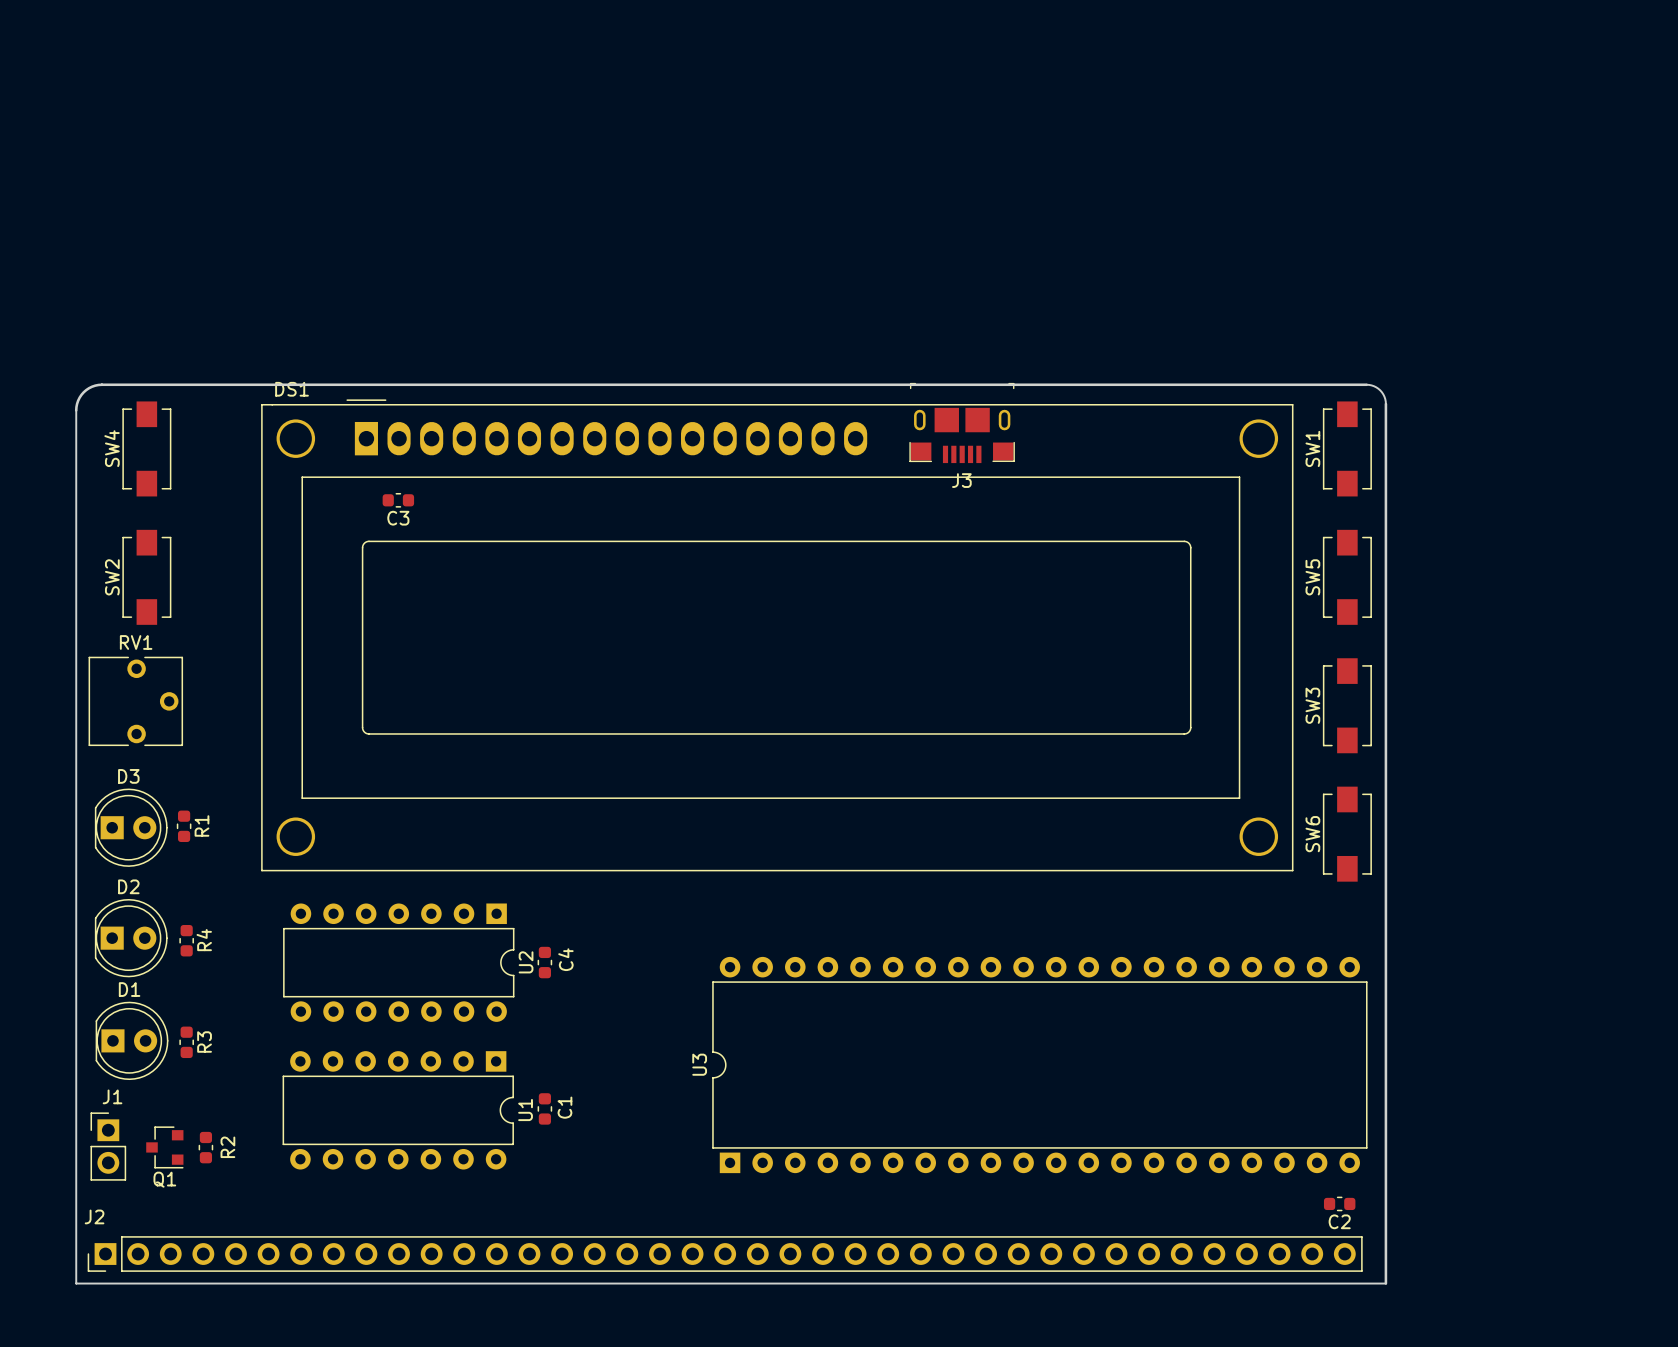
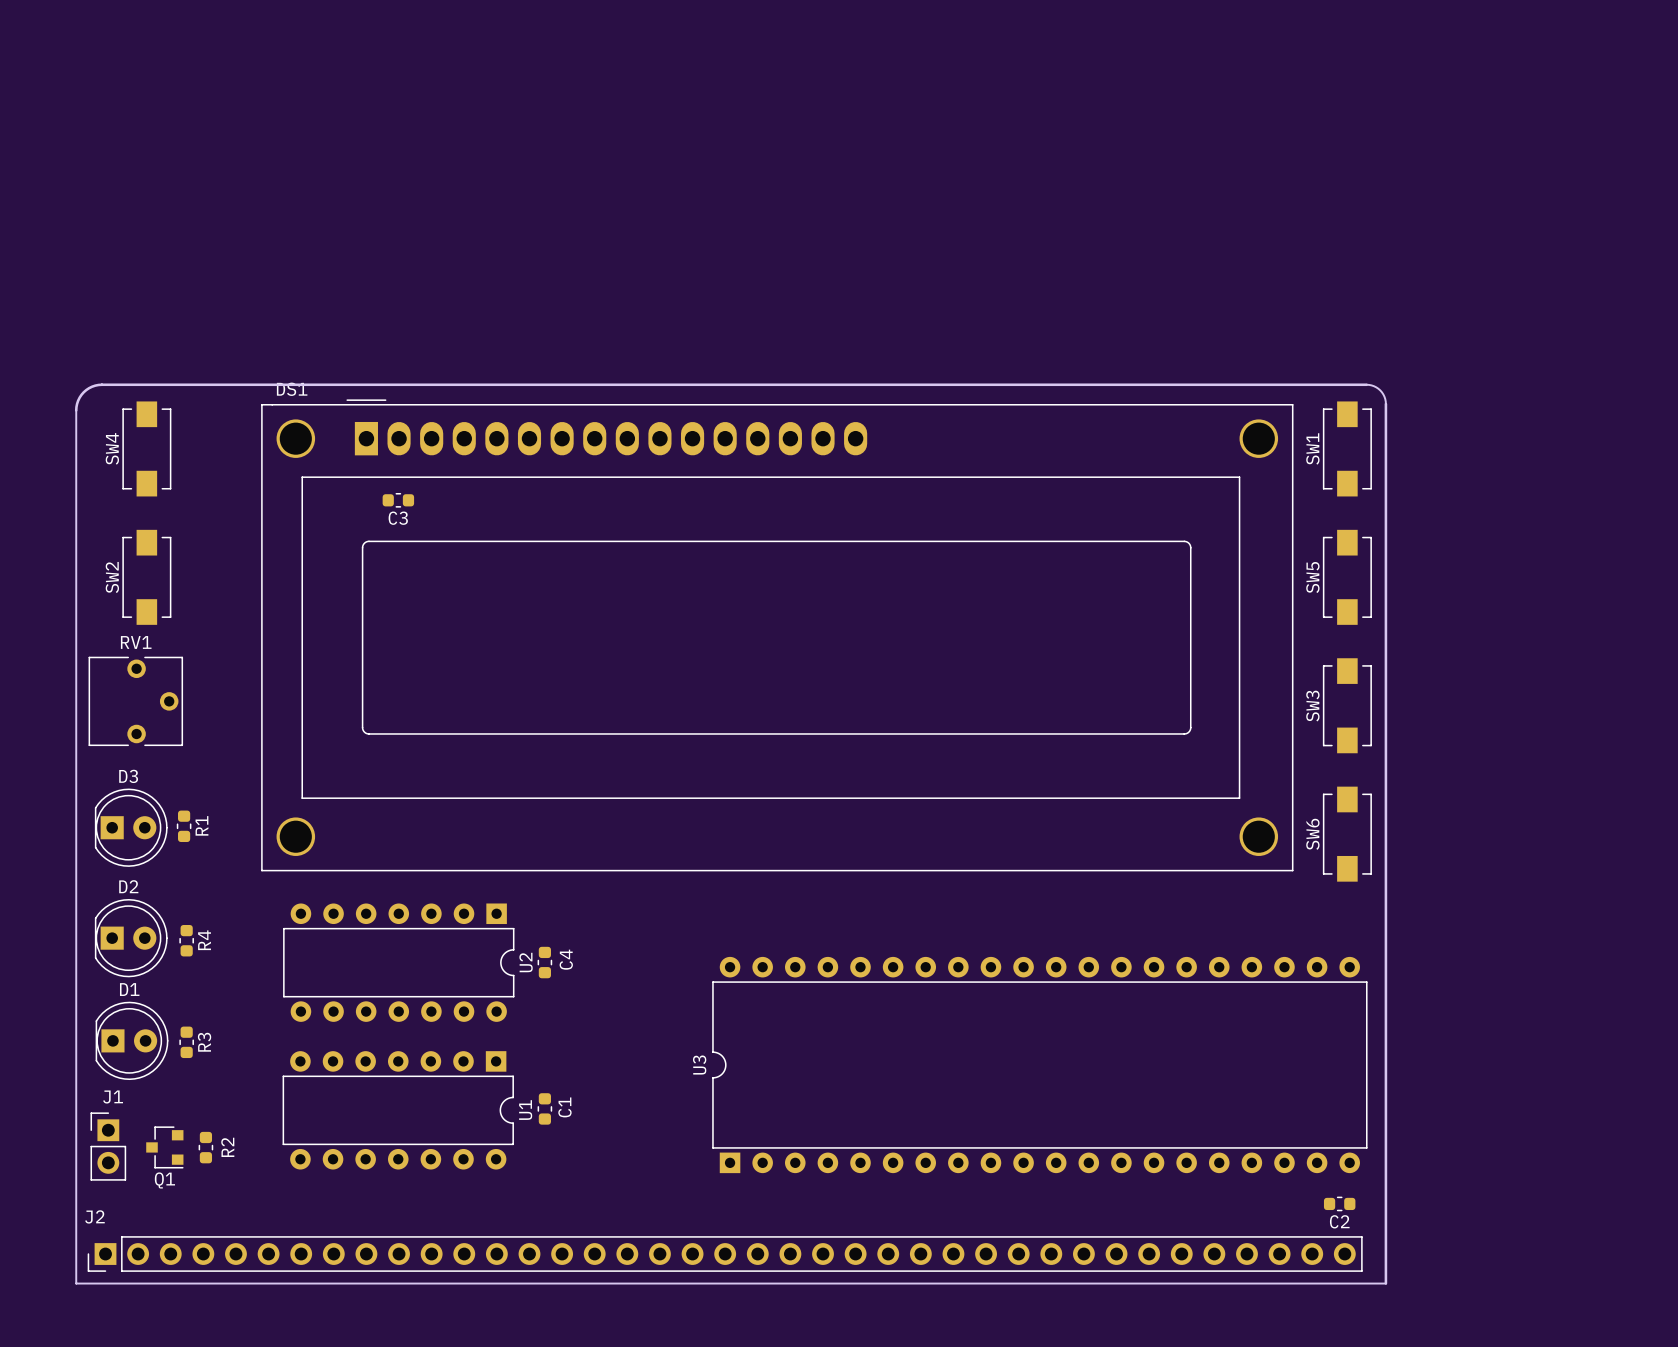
J3: (962, 423) -> none

